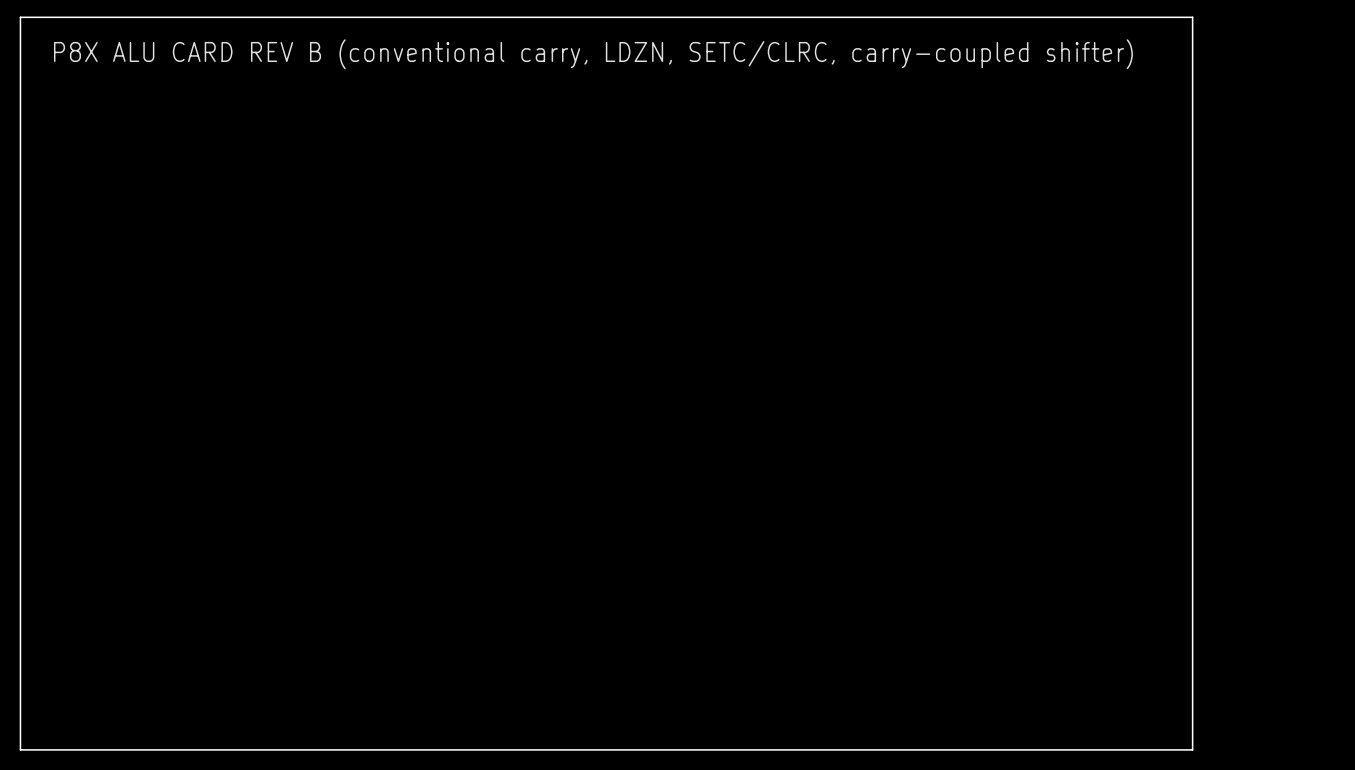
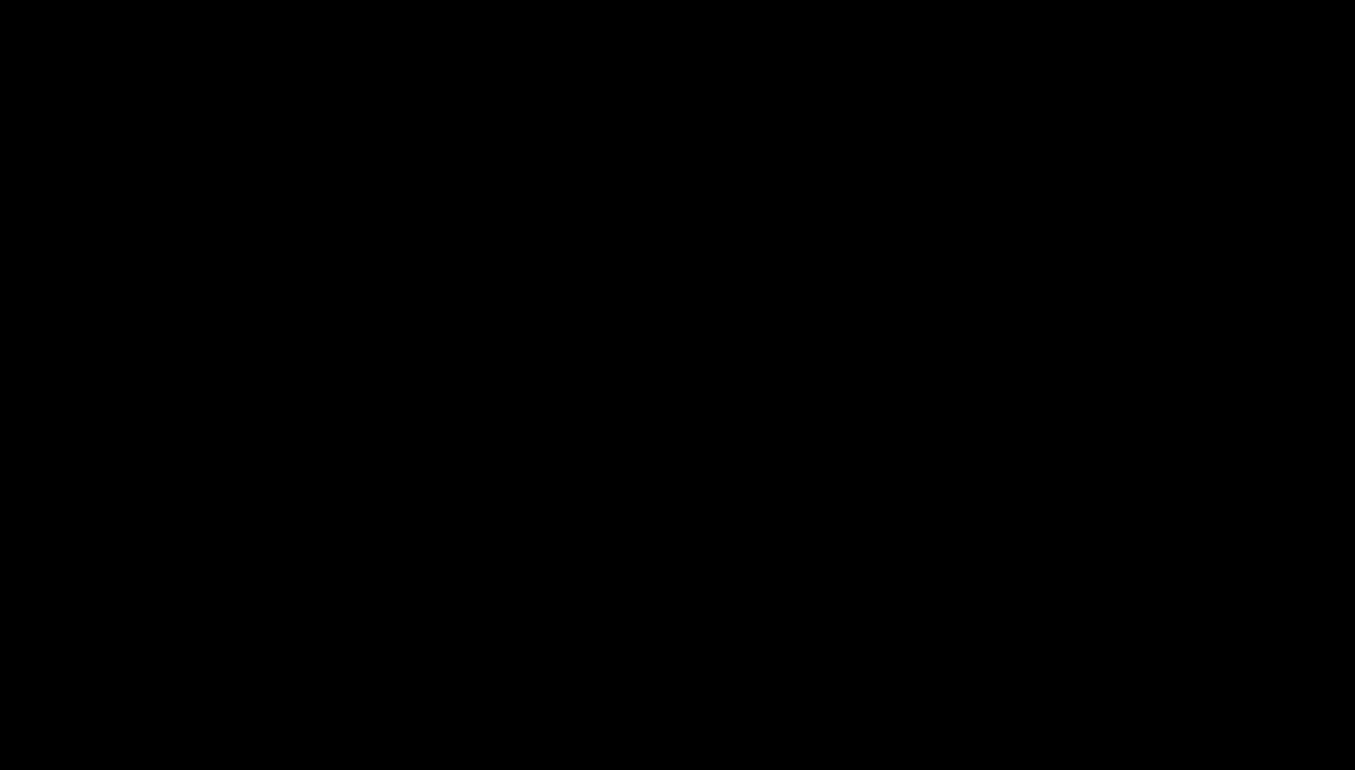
board edge: (20, 17) (1192, 17) (1192, 749) (20, 749) (20, 17) -> none
text: P8X ALU CARD REV B (conventional carry, LDZN, SETC/CLRC, carry-coupled shifter) (593, 54) -> none

